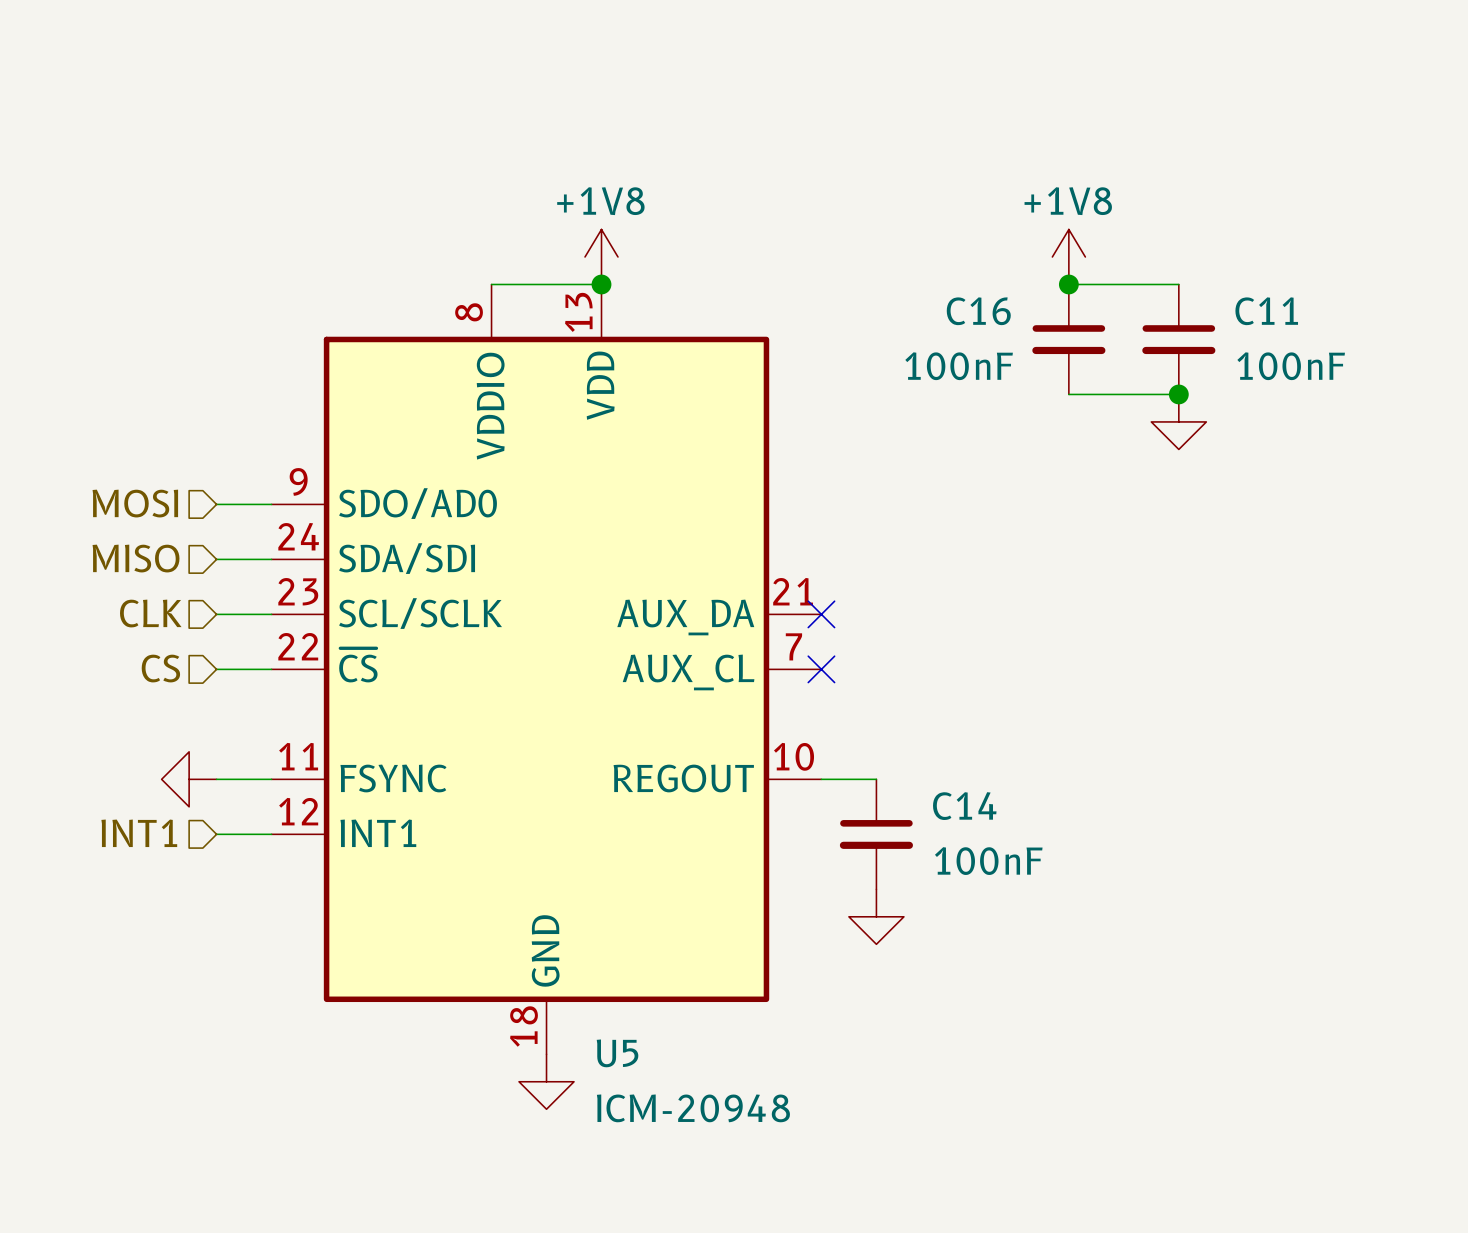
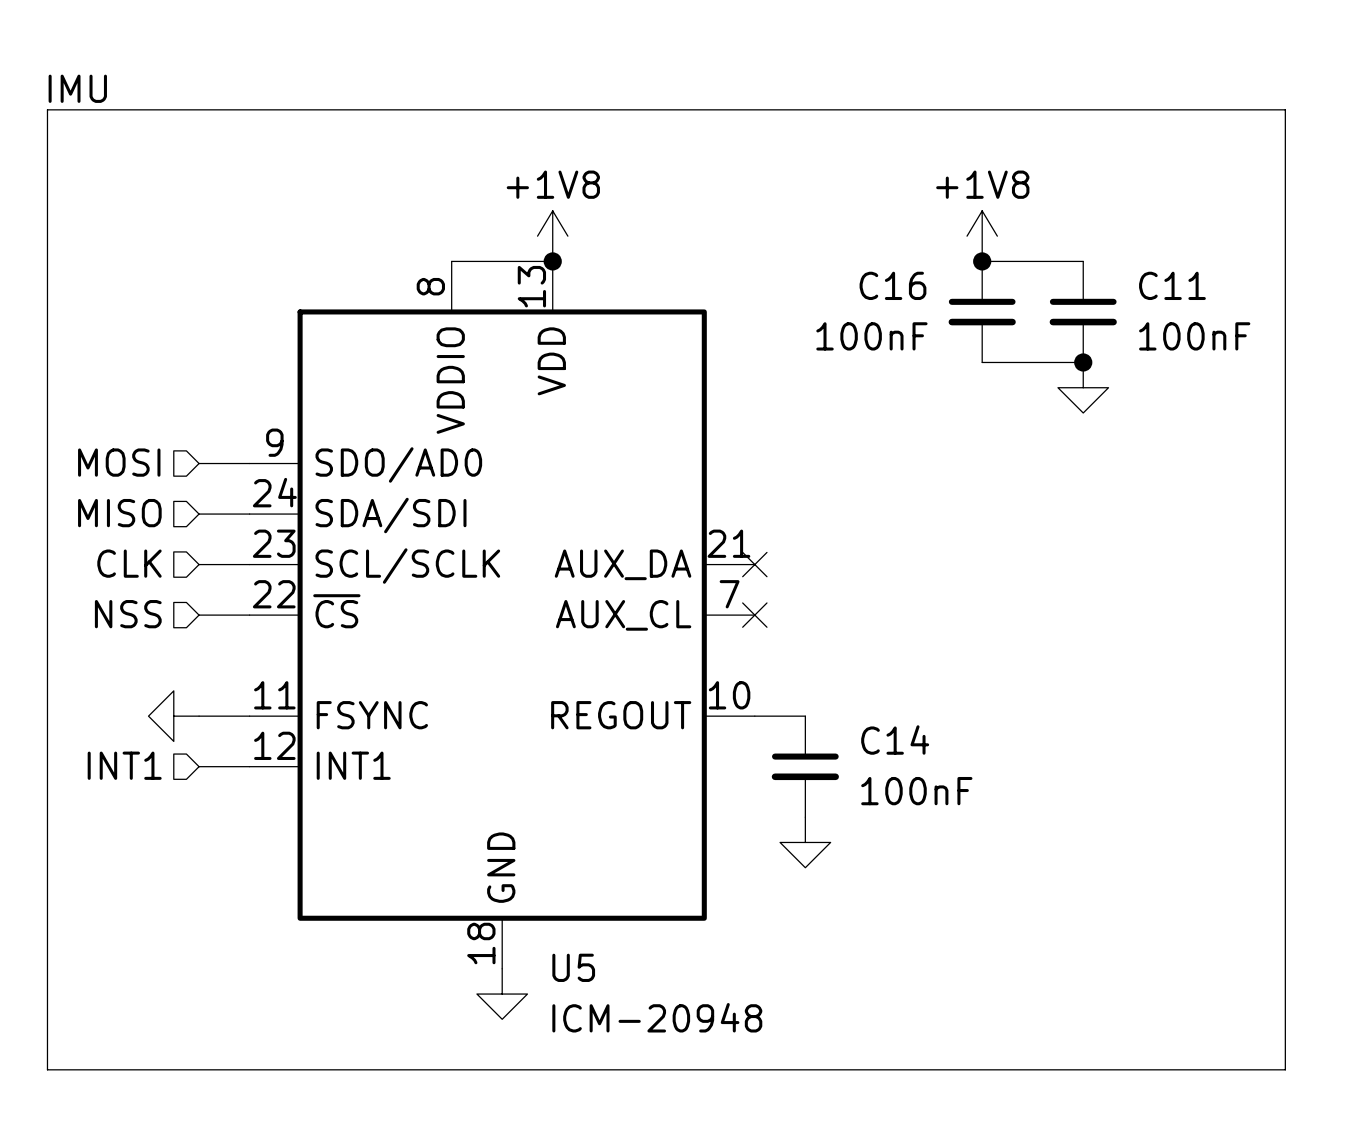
text: none -> IMU (77, 88)
line: none -> (47, 109) (1285, 109) (1285, 1069) (47, 1069) (47, 109)
hierarchical label: CS (160, 668) -> NSS (128, 614)

